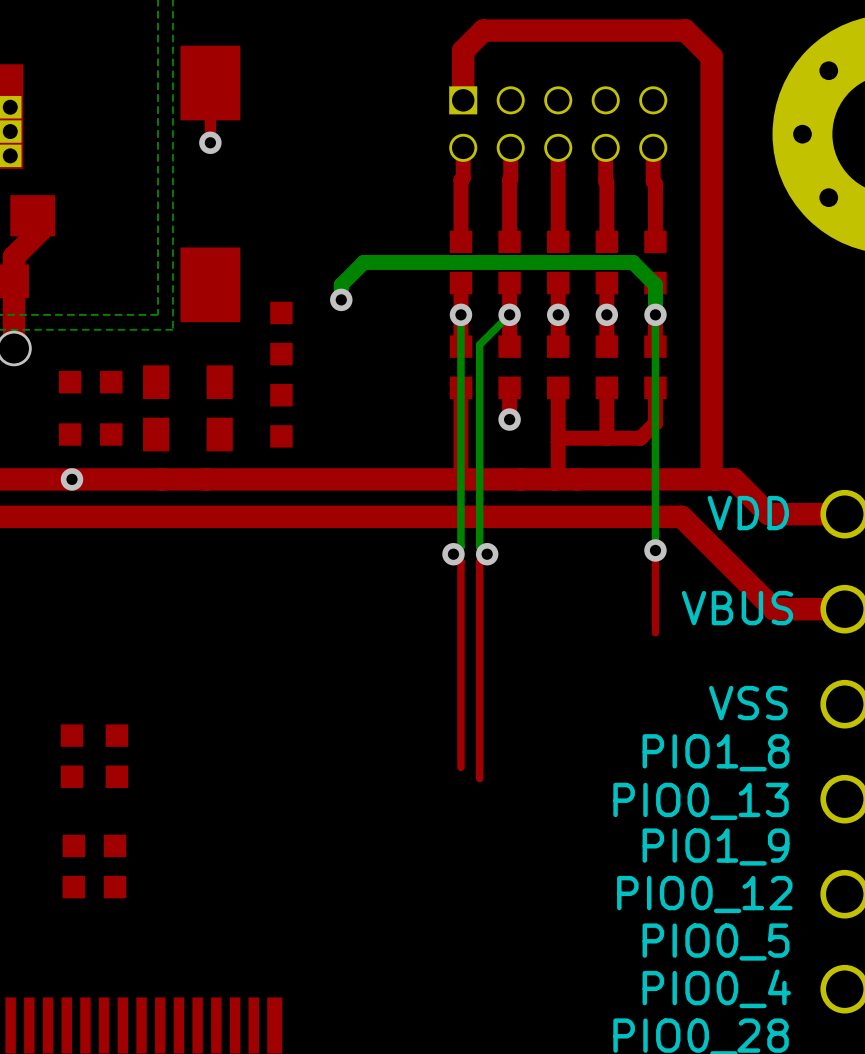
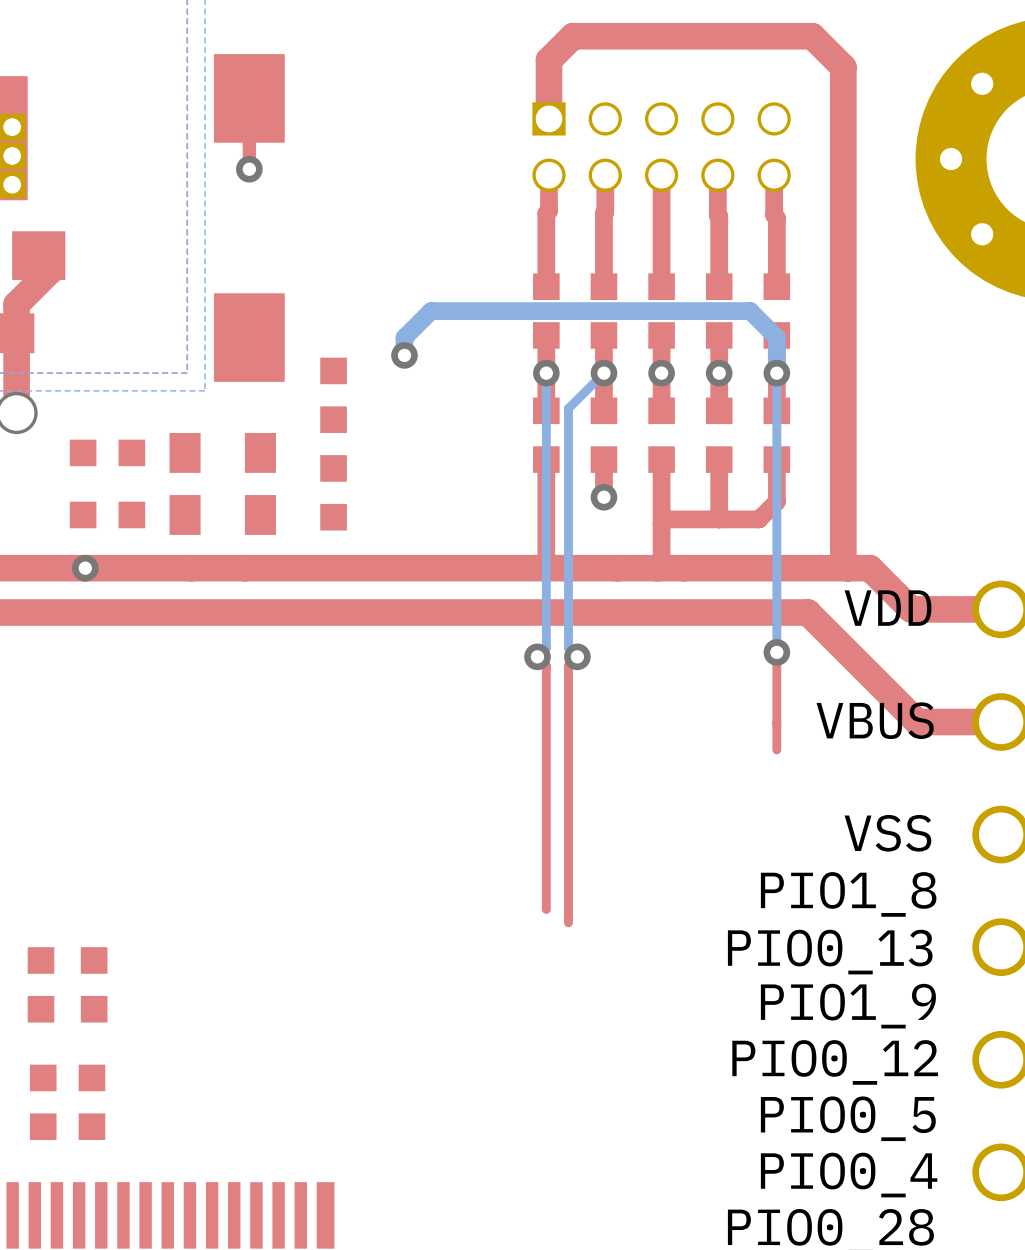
part: (71, 756) -> none
part: (116, 756) -> none
part: none -> (41, 984)
part rotation: 0° (94, 845) -> 90° clockwise (94, 984)
part: (94, 887) -> none
part: none -> (67, 1077)
part: none -> (67, 1126)

